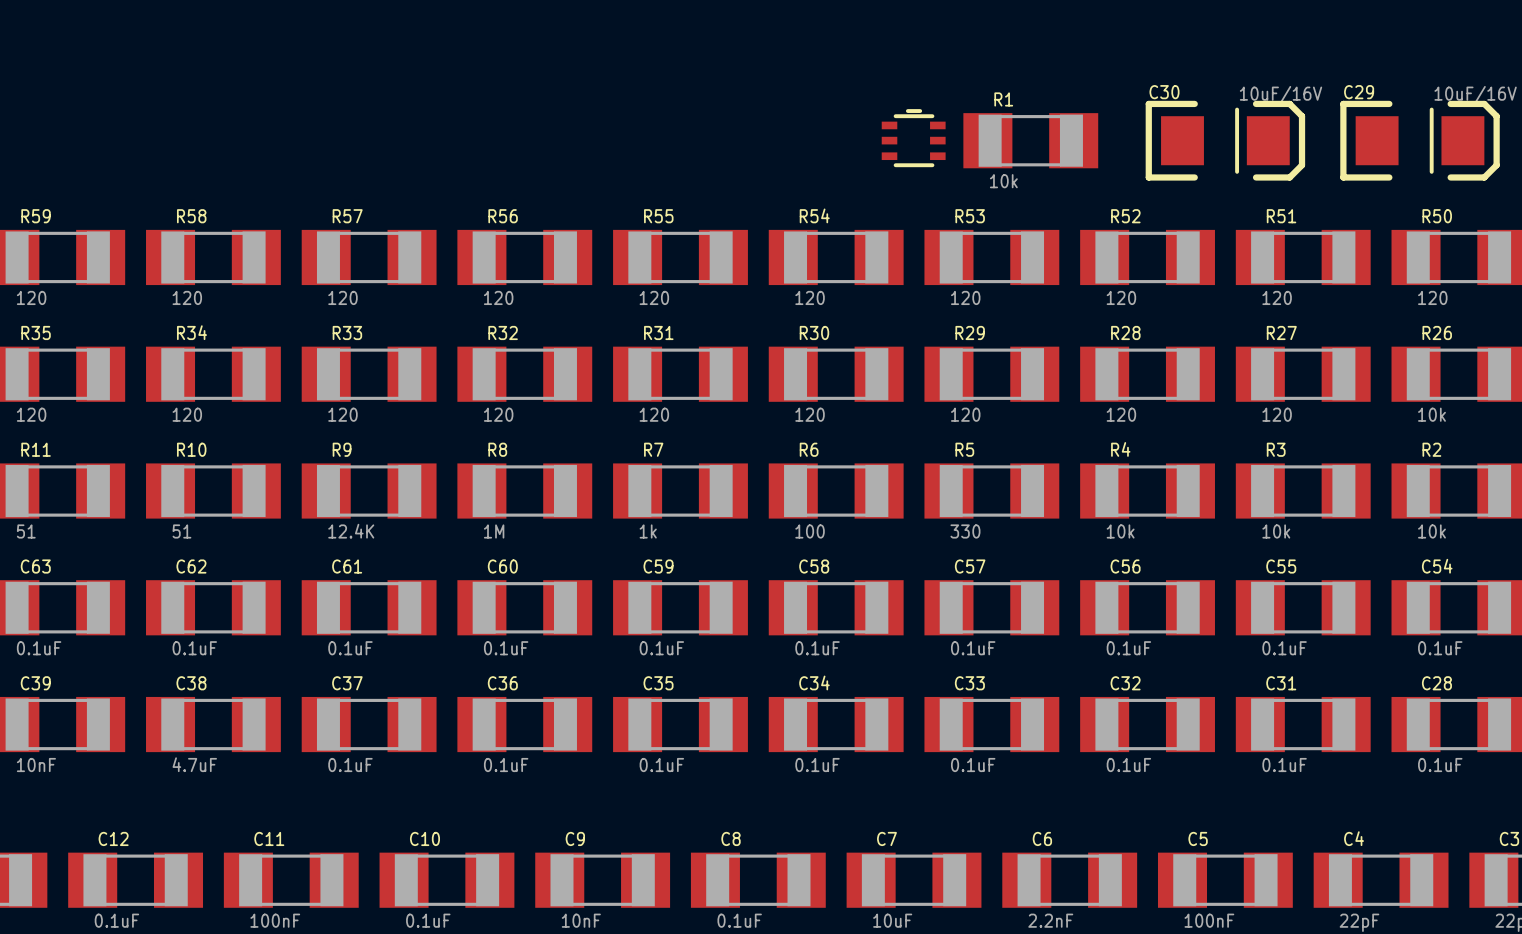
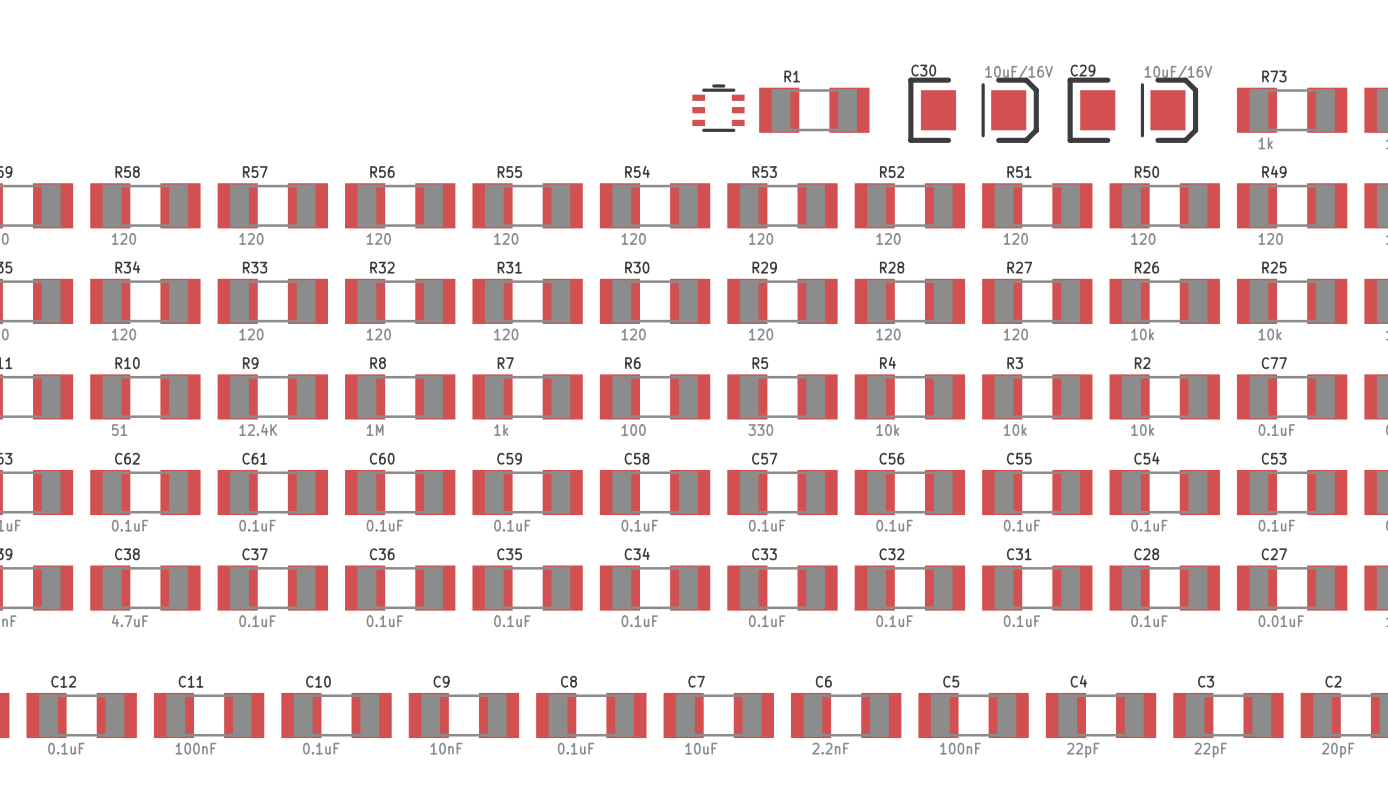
R1 value: 10k (1003, 181) -> none

